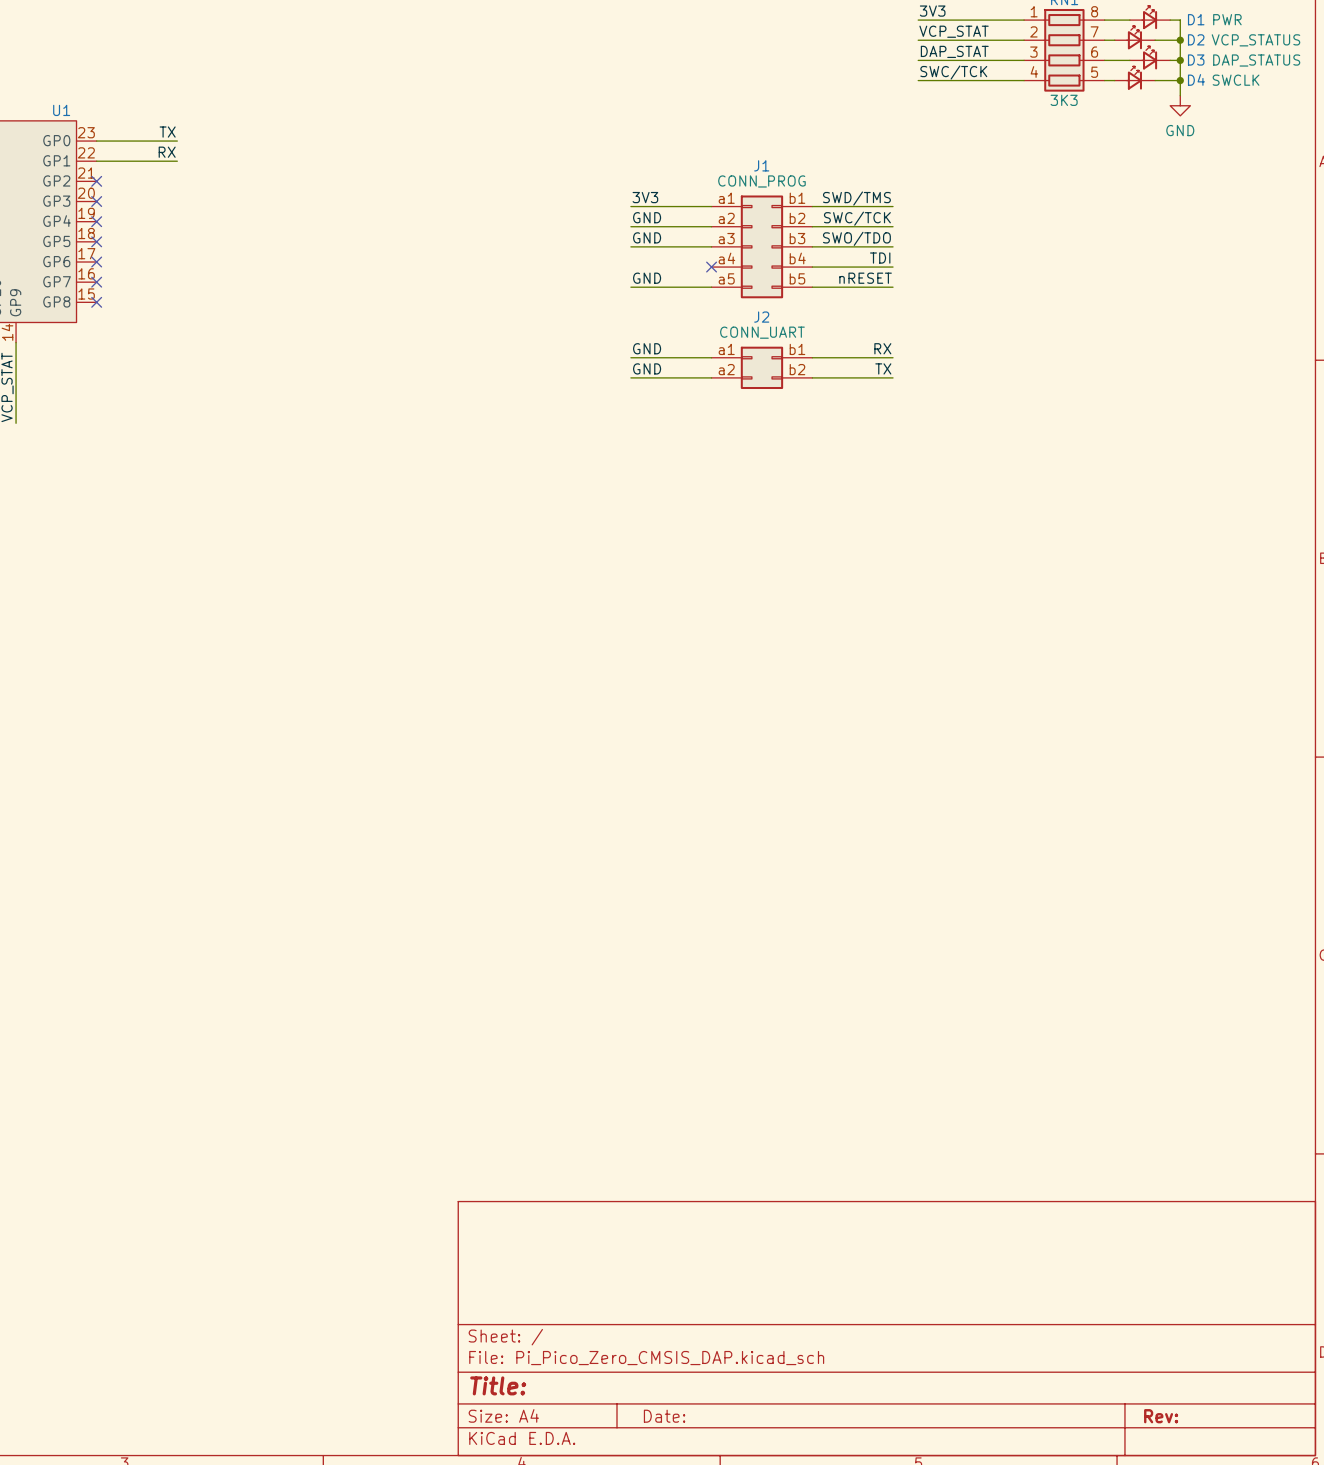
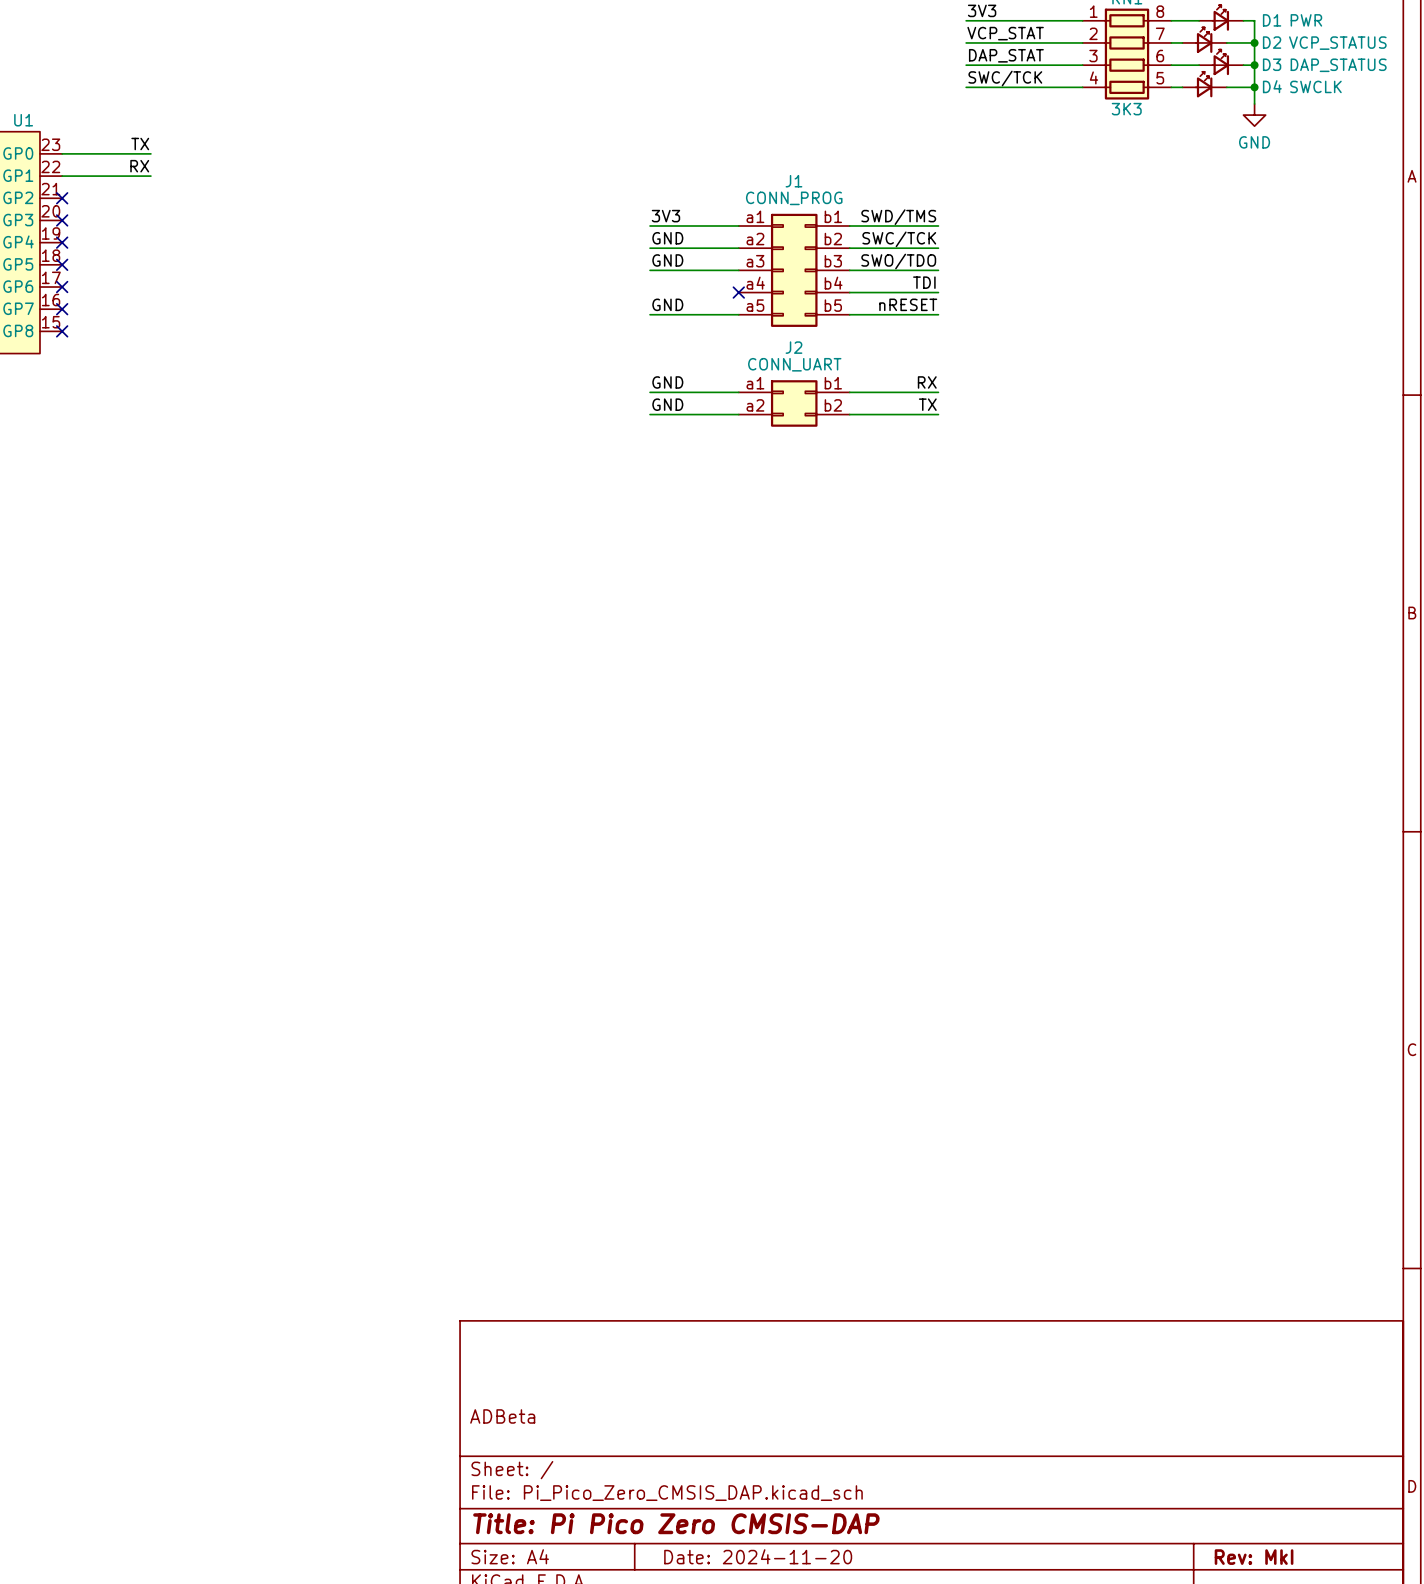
title block: none -> ADBeta (502, 1416)
title block: Title: (498, 1385) -> Title: Pi Pico Zero CMSIS-DAP (676, 1523)
title block: Date: (664, 1416) -> Date: 2024-11-20 (758, 1556)
title block: Rev: (1161, 1416) -> Rev: MkI (1254, 1557)

